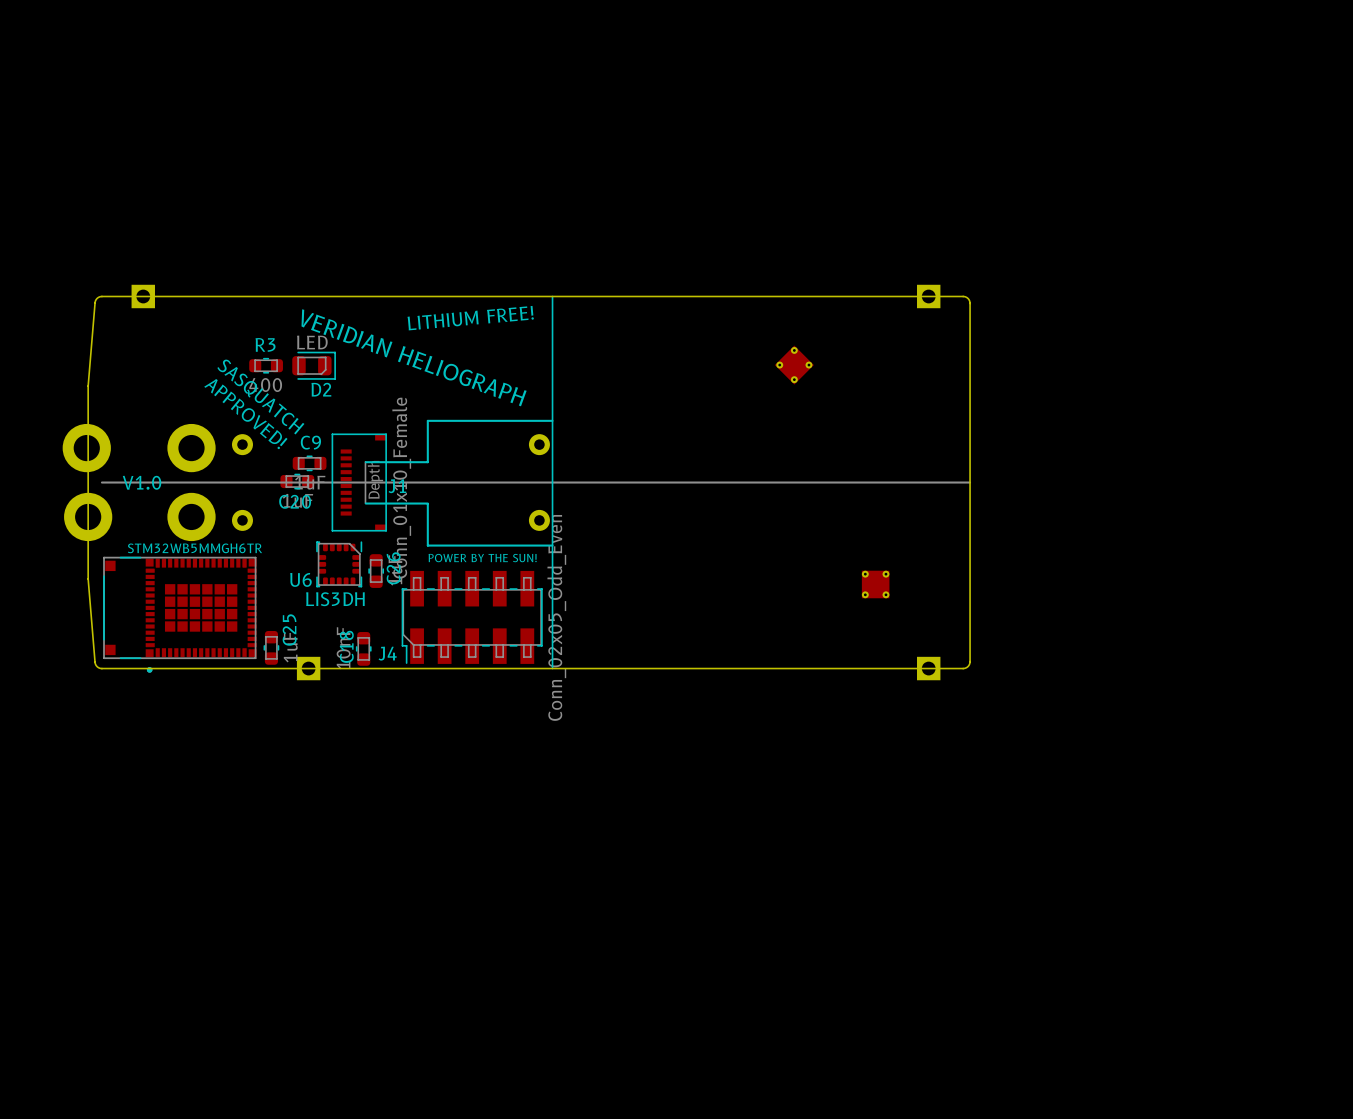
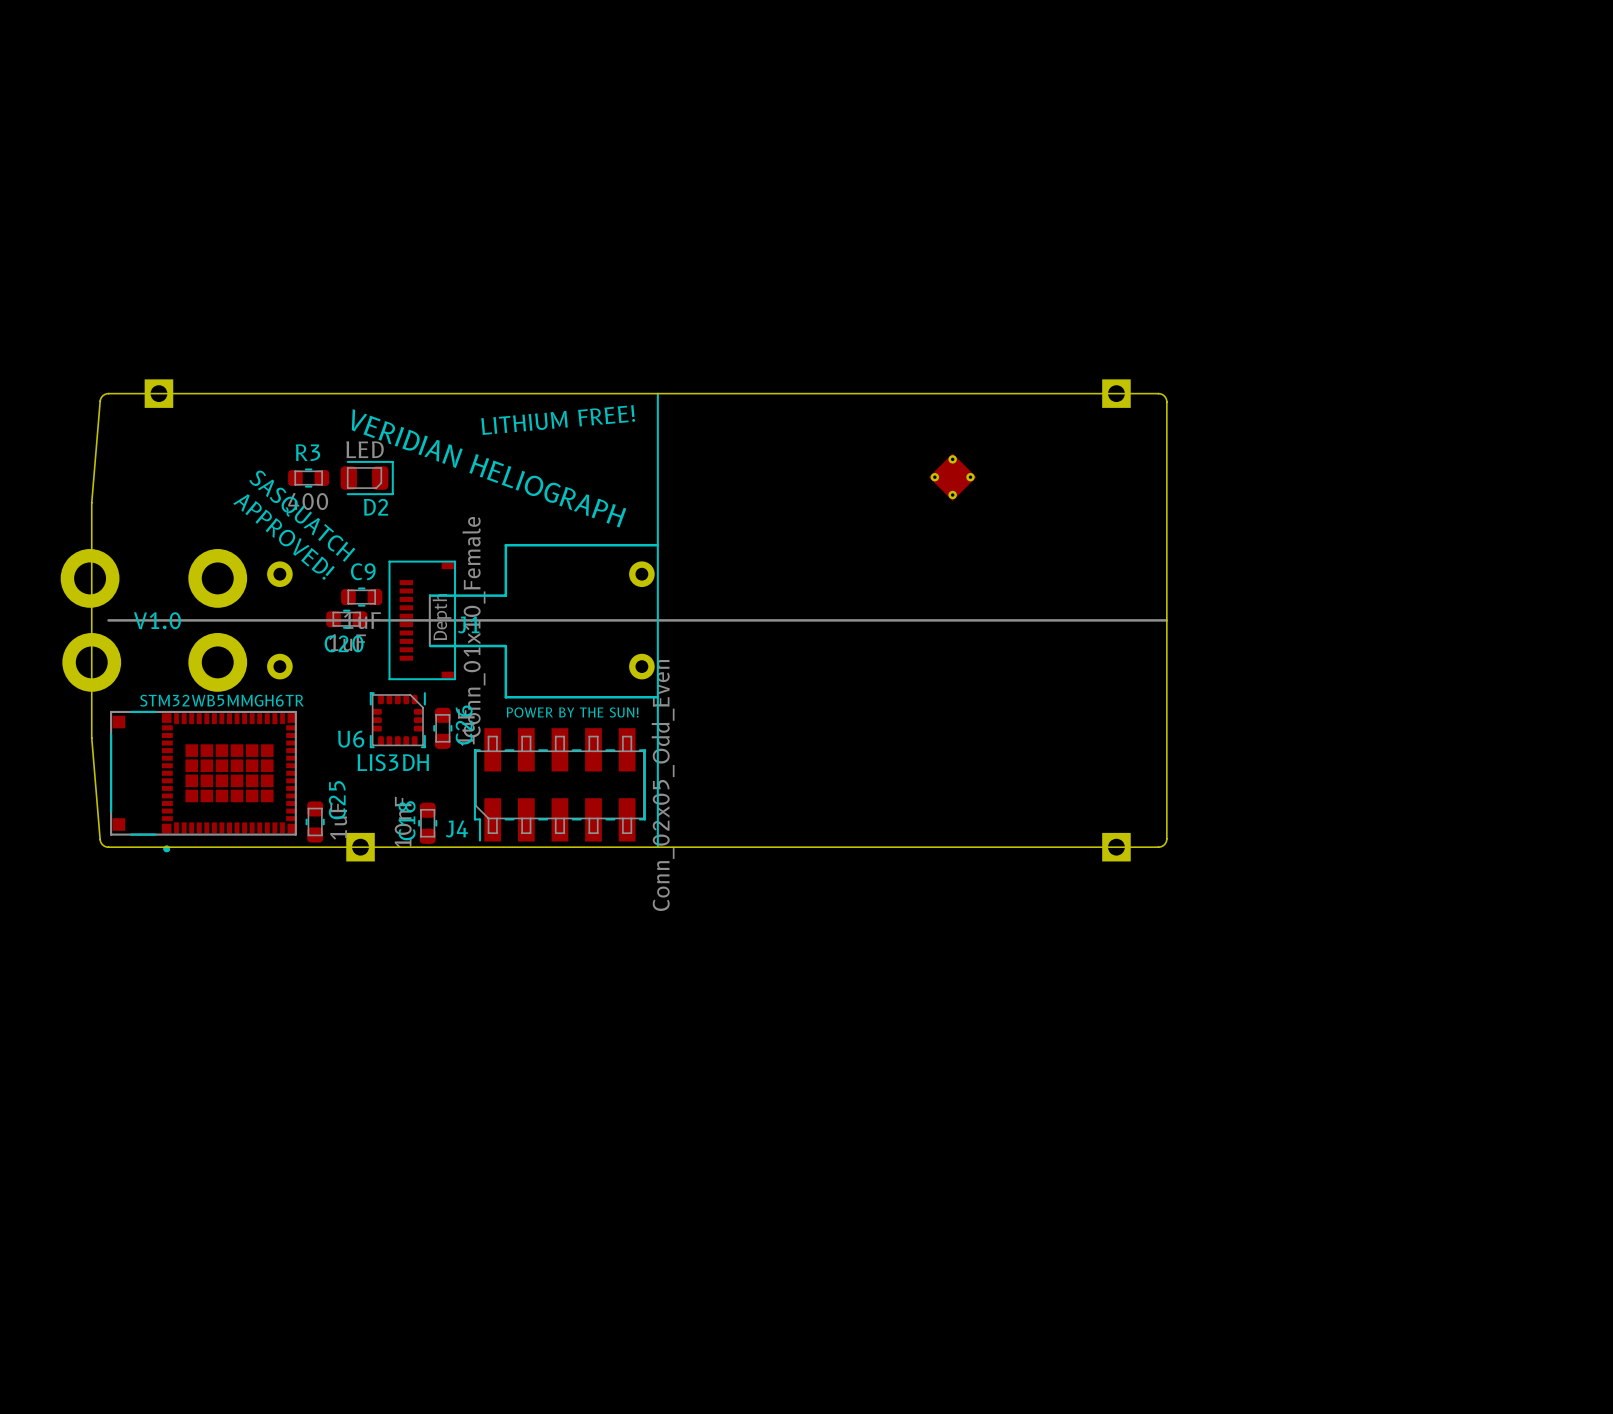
part: (875, 584) -> none

